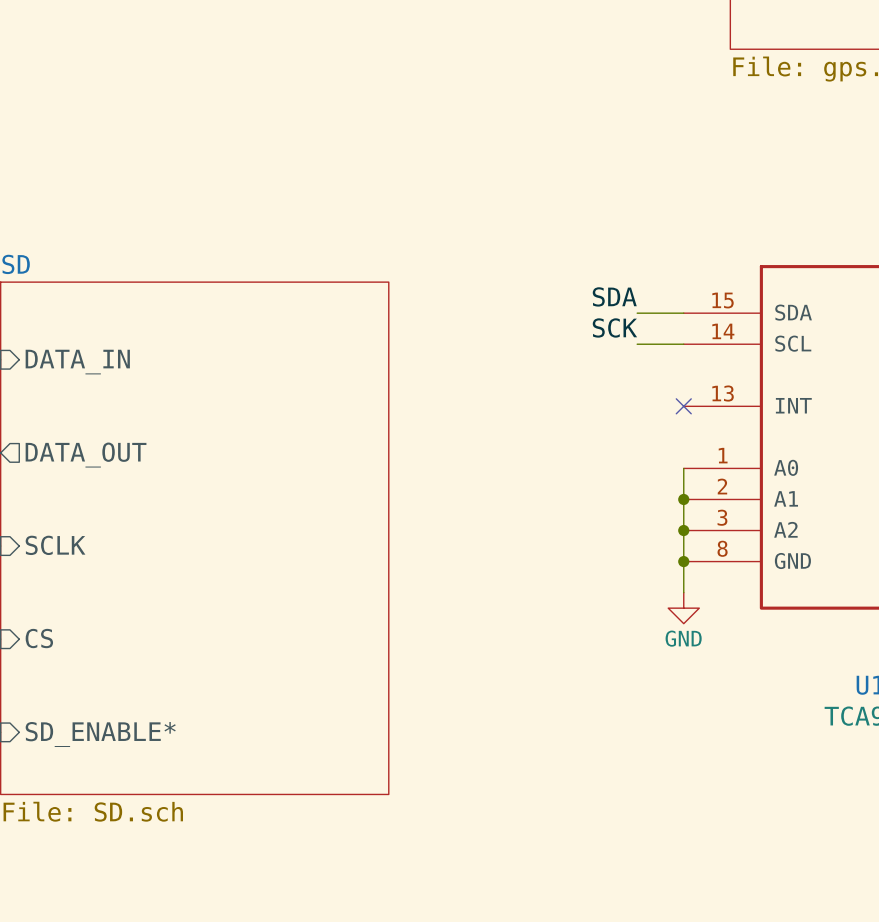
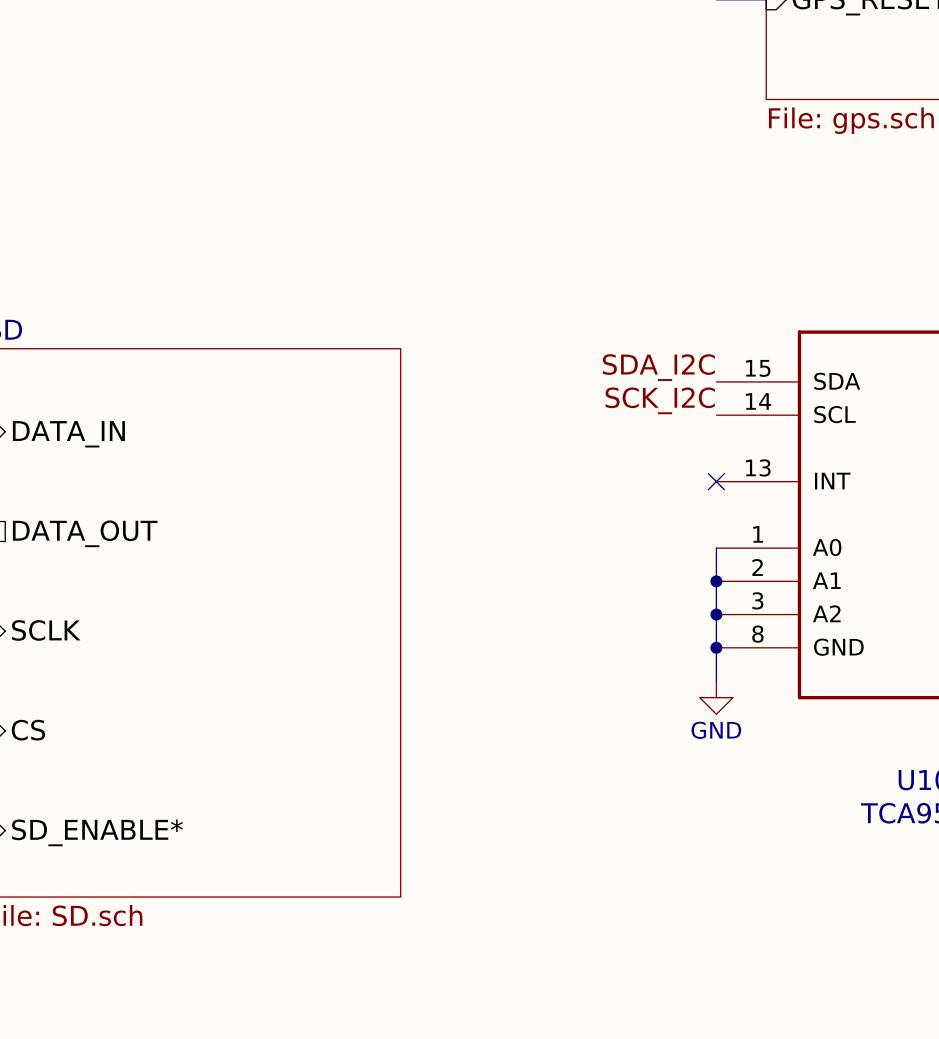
label: SDA (614, 296) -> none
label: none -> SDA_I2C (658, 367)
wire: (637, 313) (683, 313) -> none
label: SCK (614, 327) -> none
label: none -> SCK_I2C (660, 400)
wire: (637, 344) (683, 344) -> none

